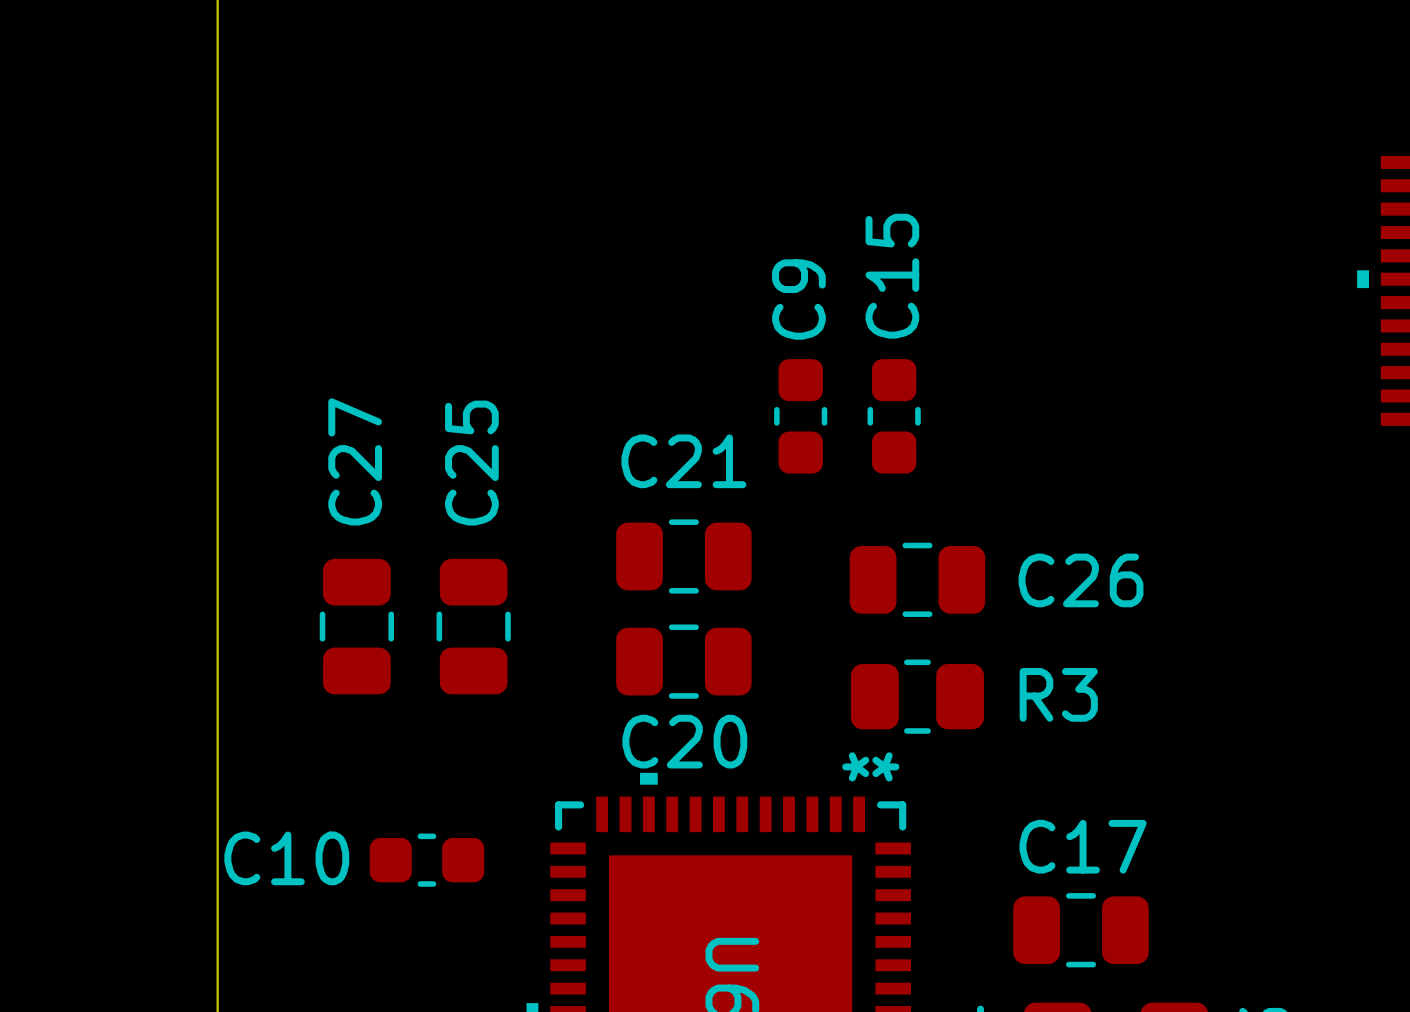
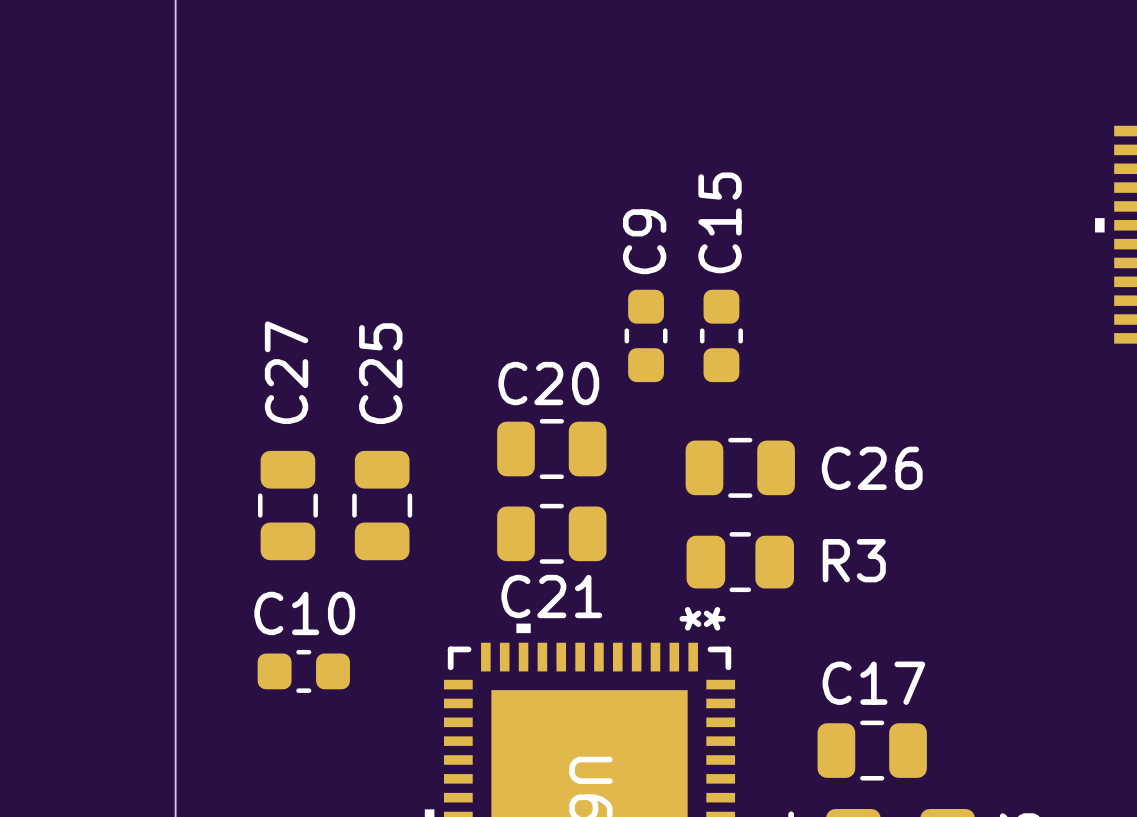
C21 name: C21 (683, 461) -> C20 (548, 383)
C20 name: C20 (684, 741) -> C21 (551, 596)
C10 name position: C10 (286, 858) -> C10 (304, 613)
C10 position: (426, 860) -> (303, 671)

